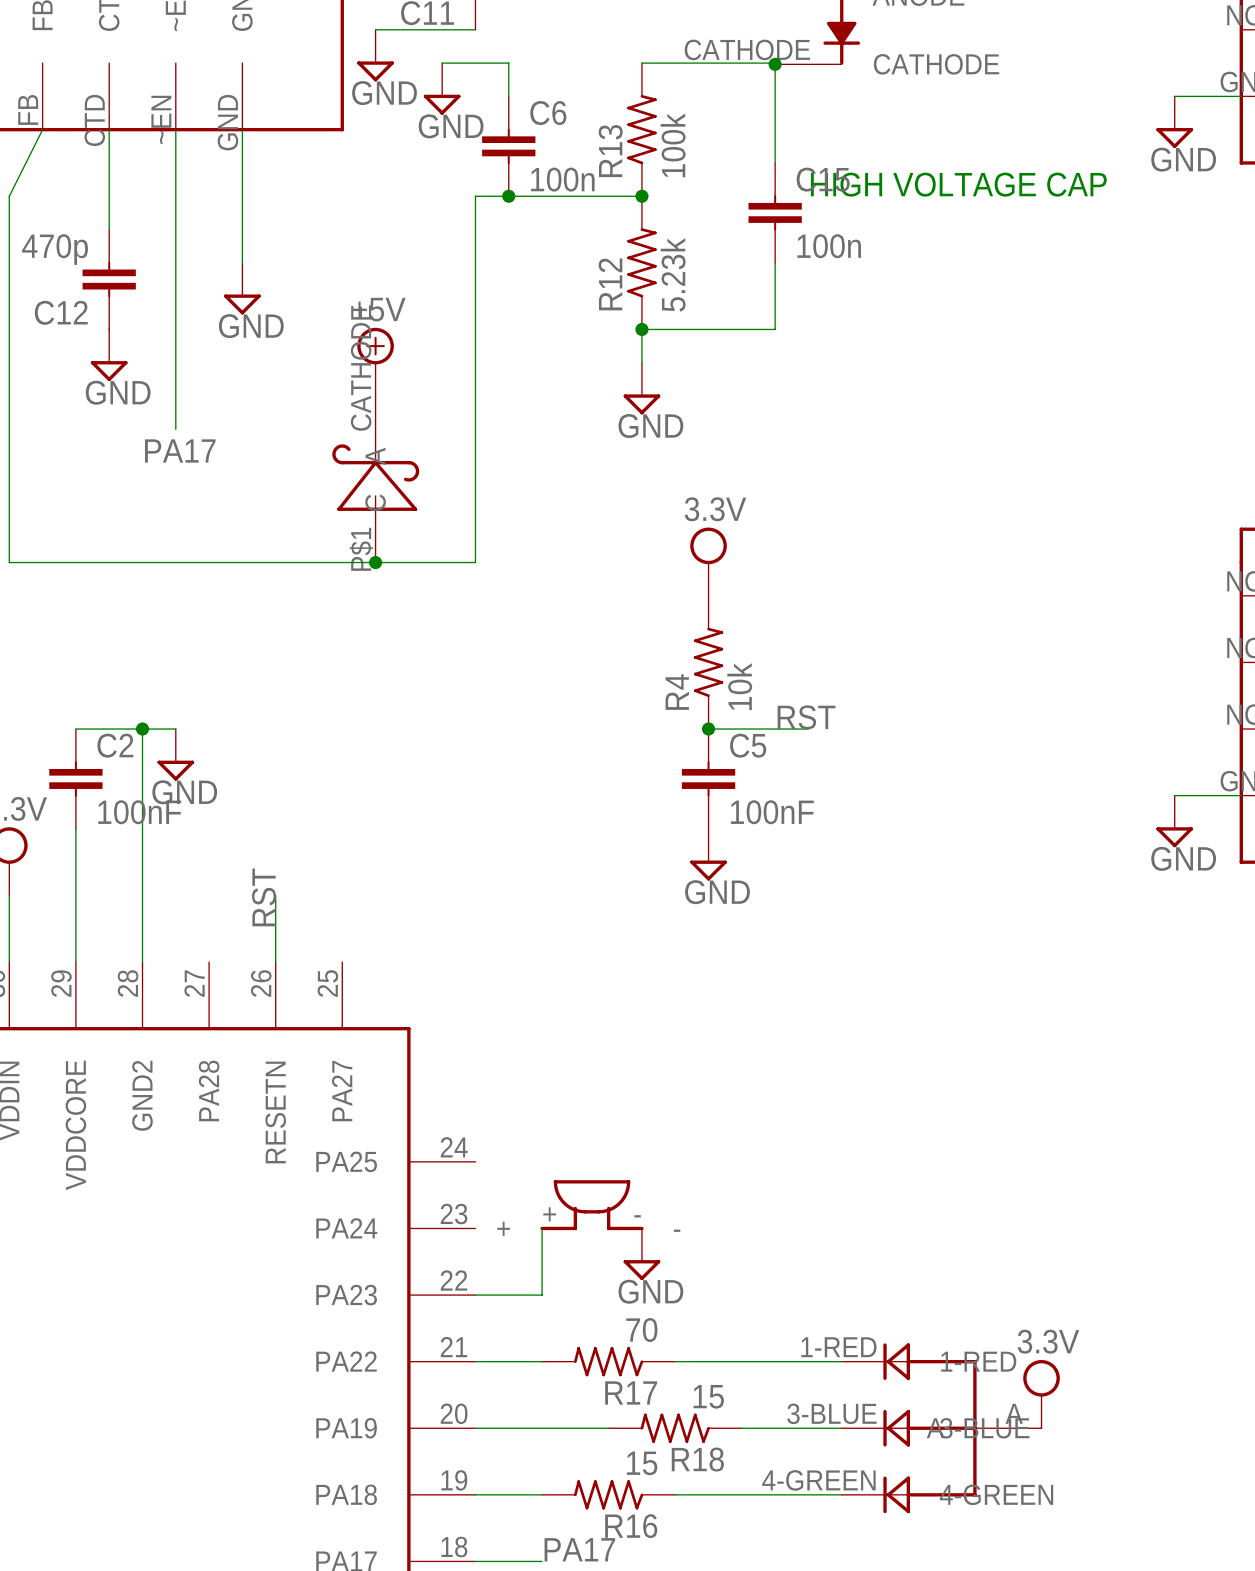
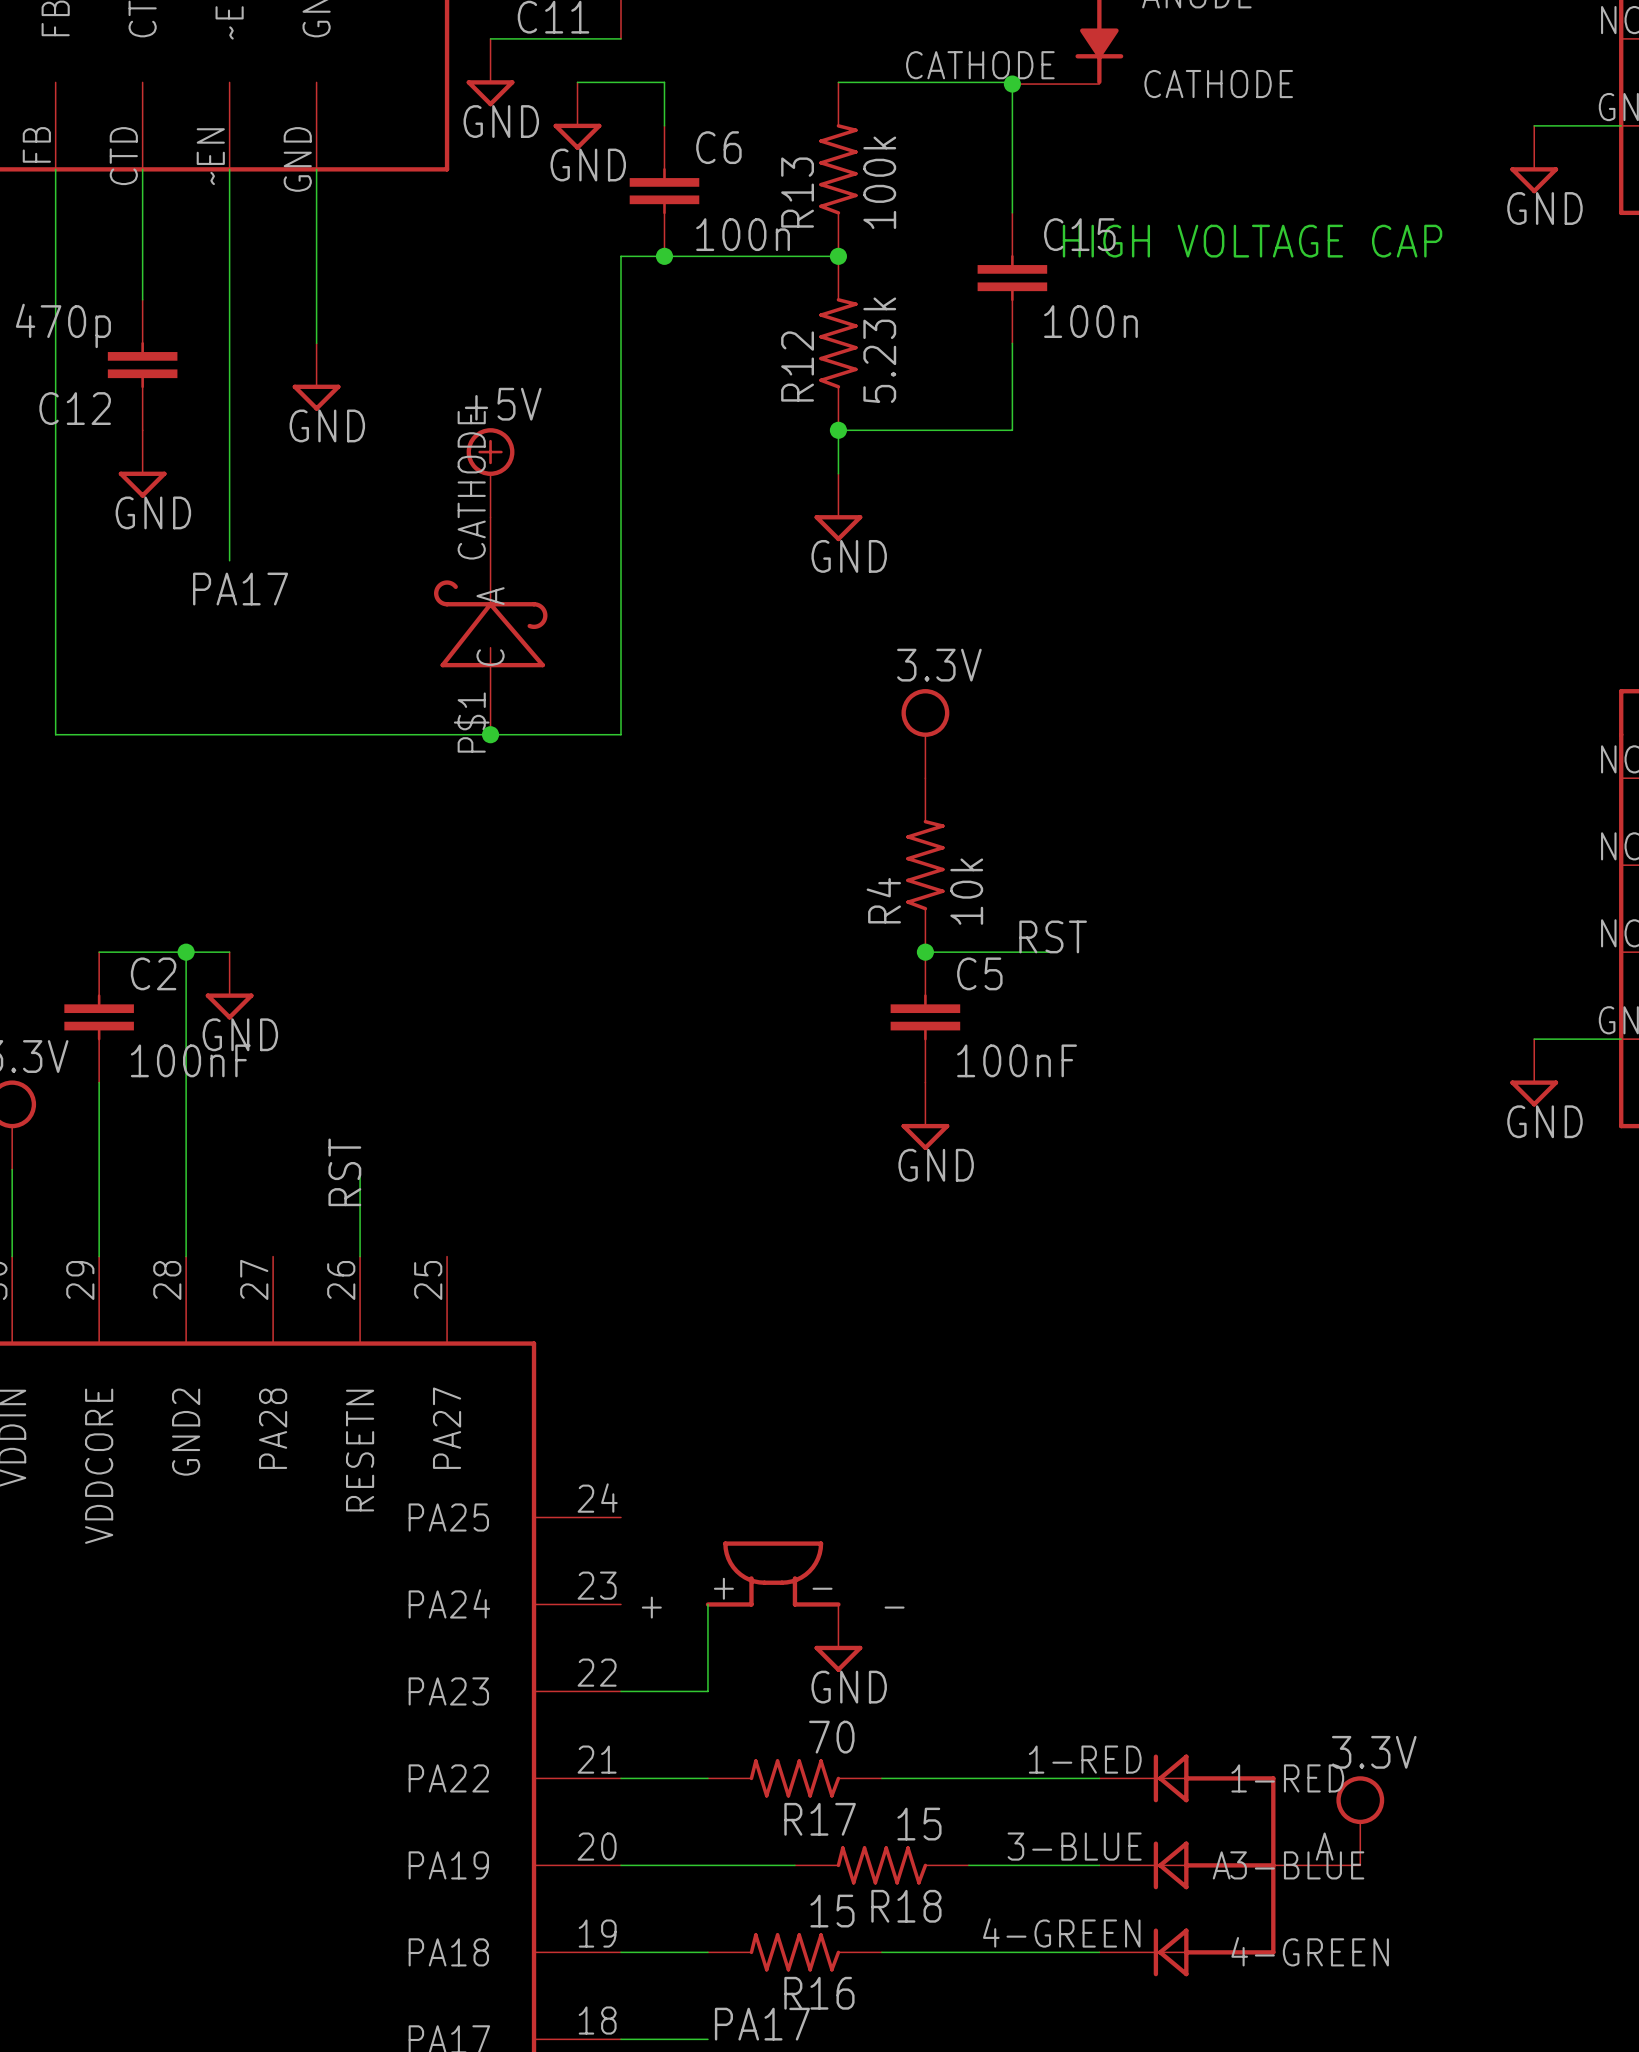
wire: (42, 129) (9, 196) (9, 562) (42, 562) -> (55, 169) (55, 734)

